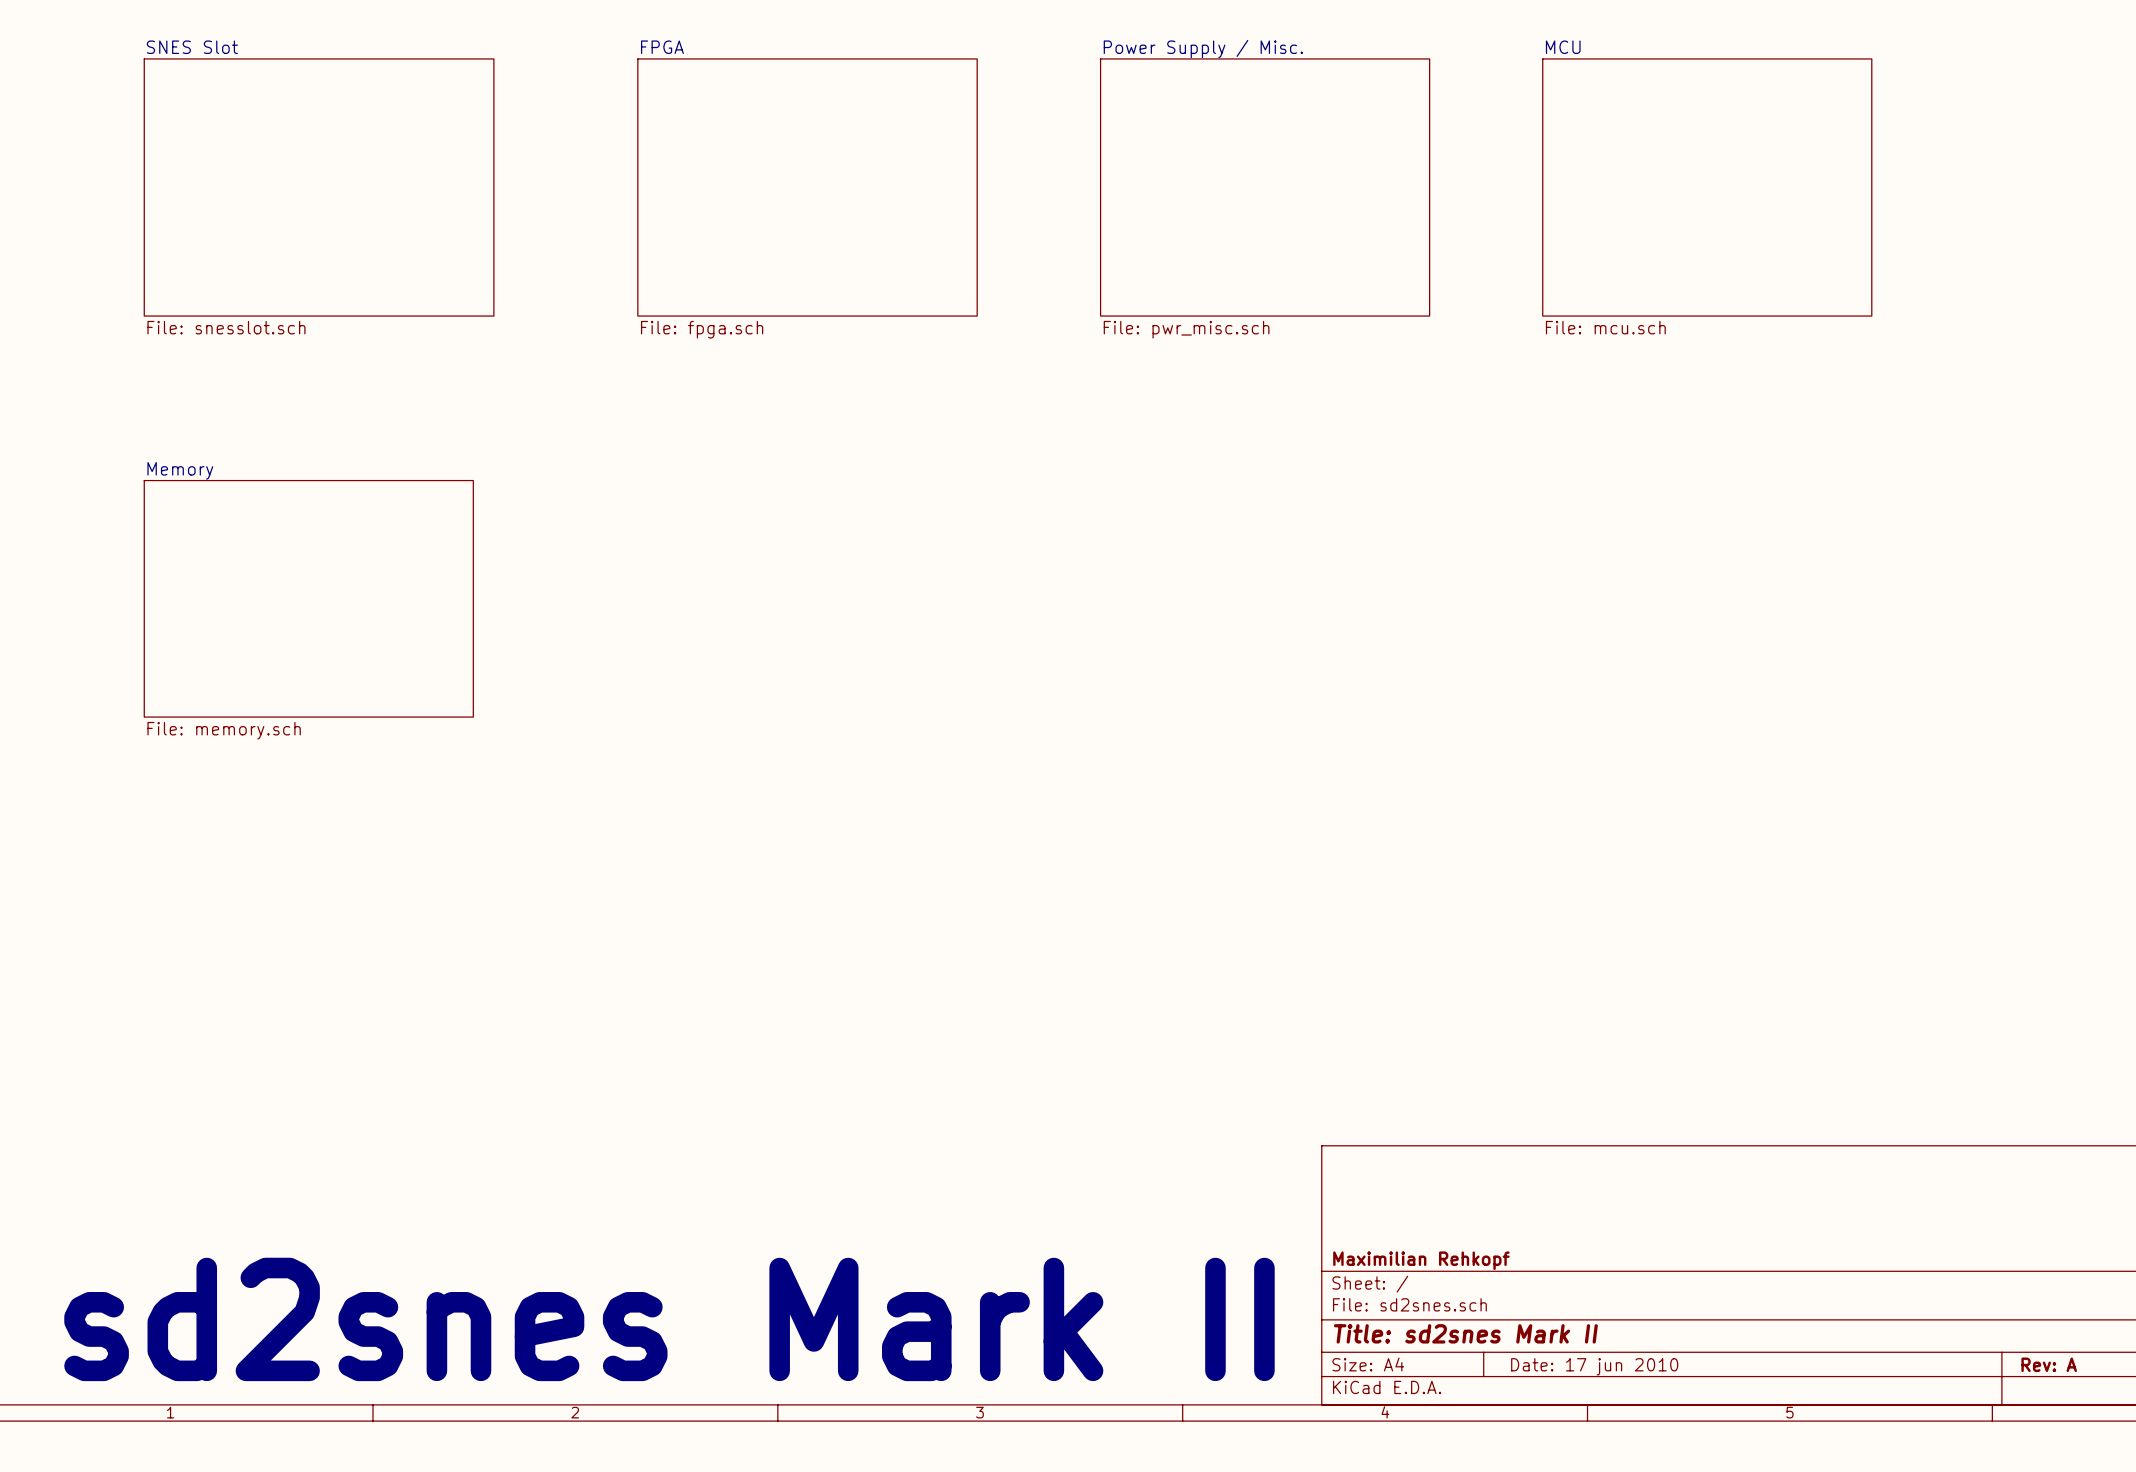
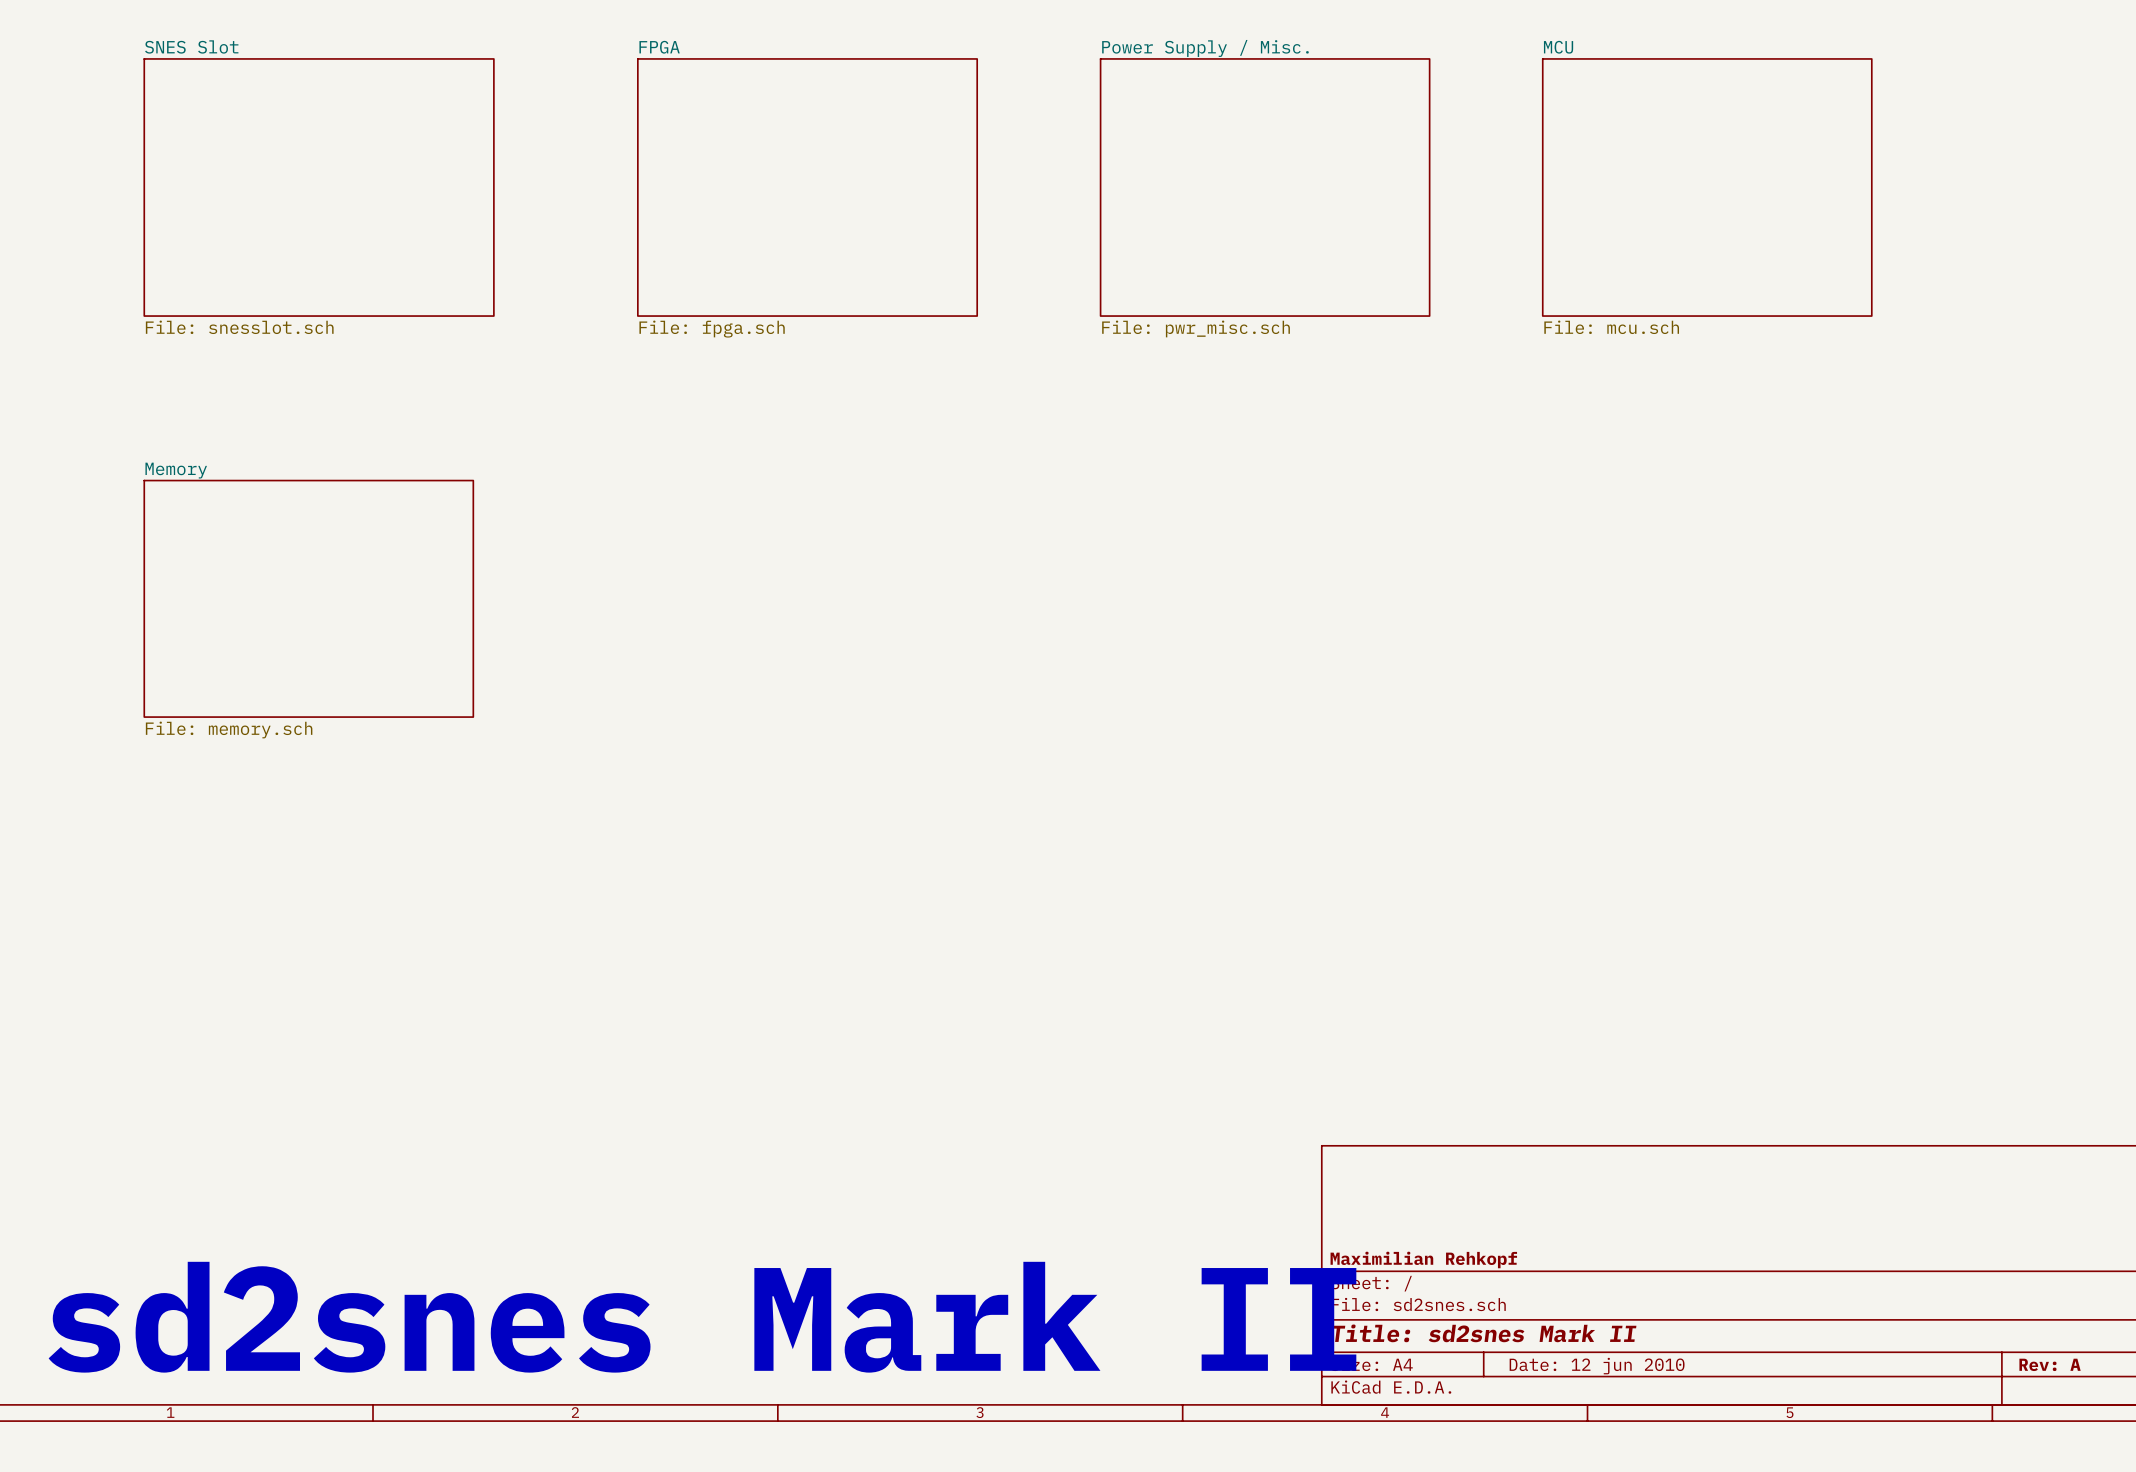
title block: Date: 17 jun 2010 (1594, 1366) -> Date: 12 jun 2010 (1597, 1366)

